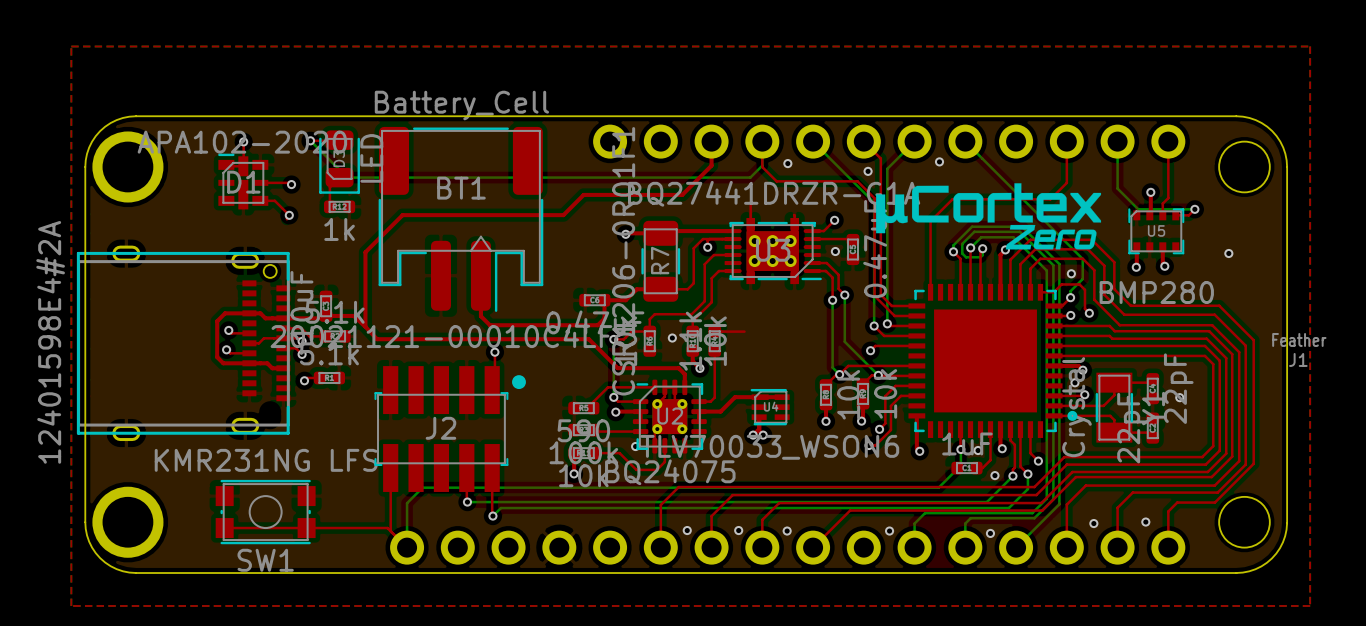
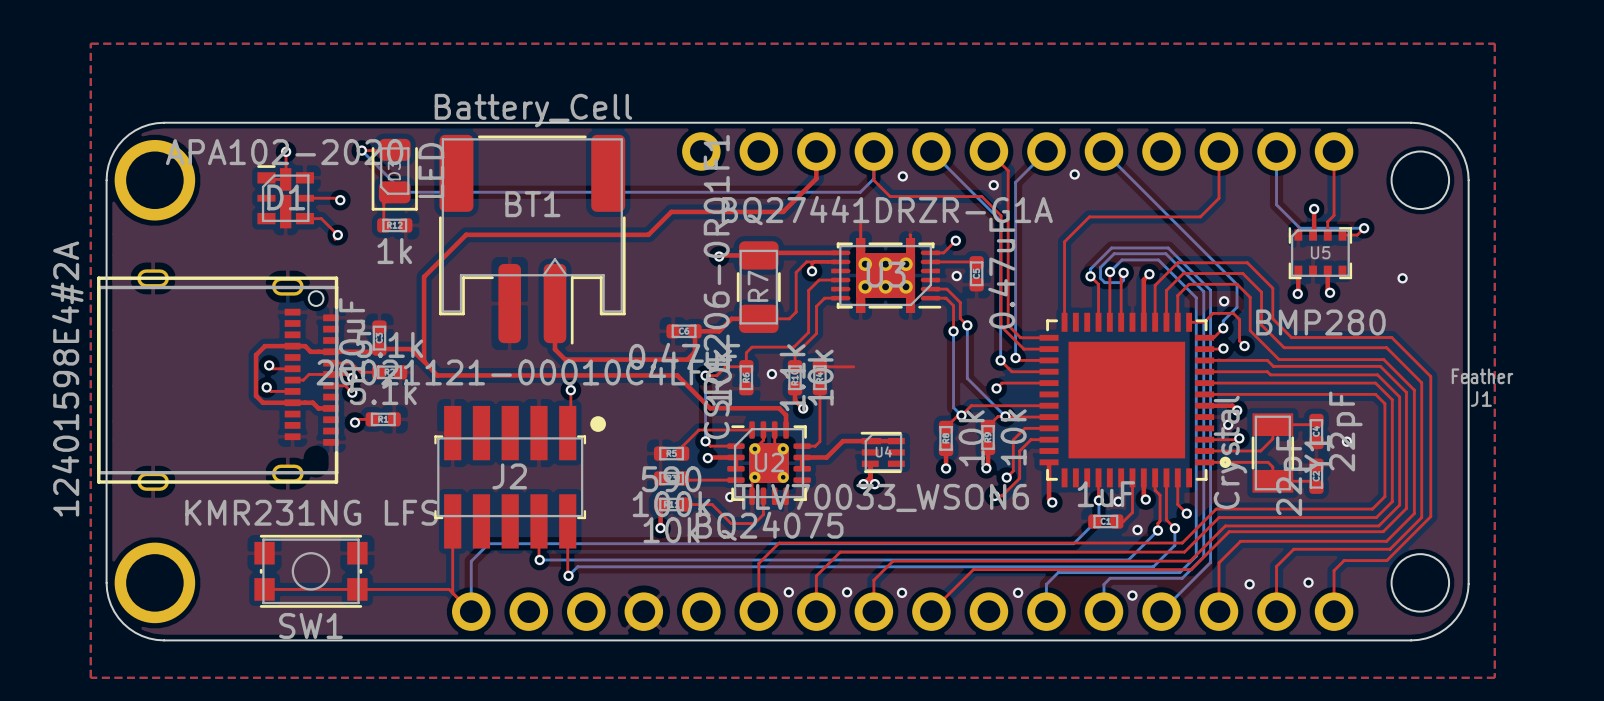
drawing: [876, 183, 1102, 250] -> none

